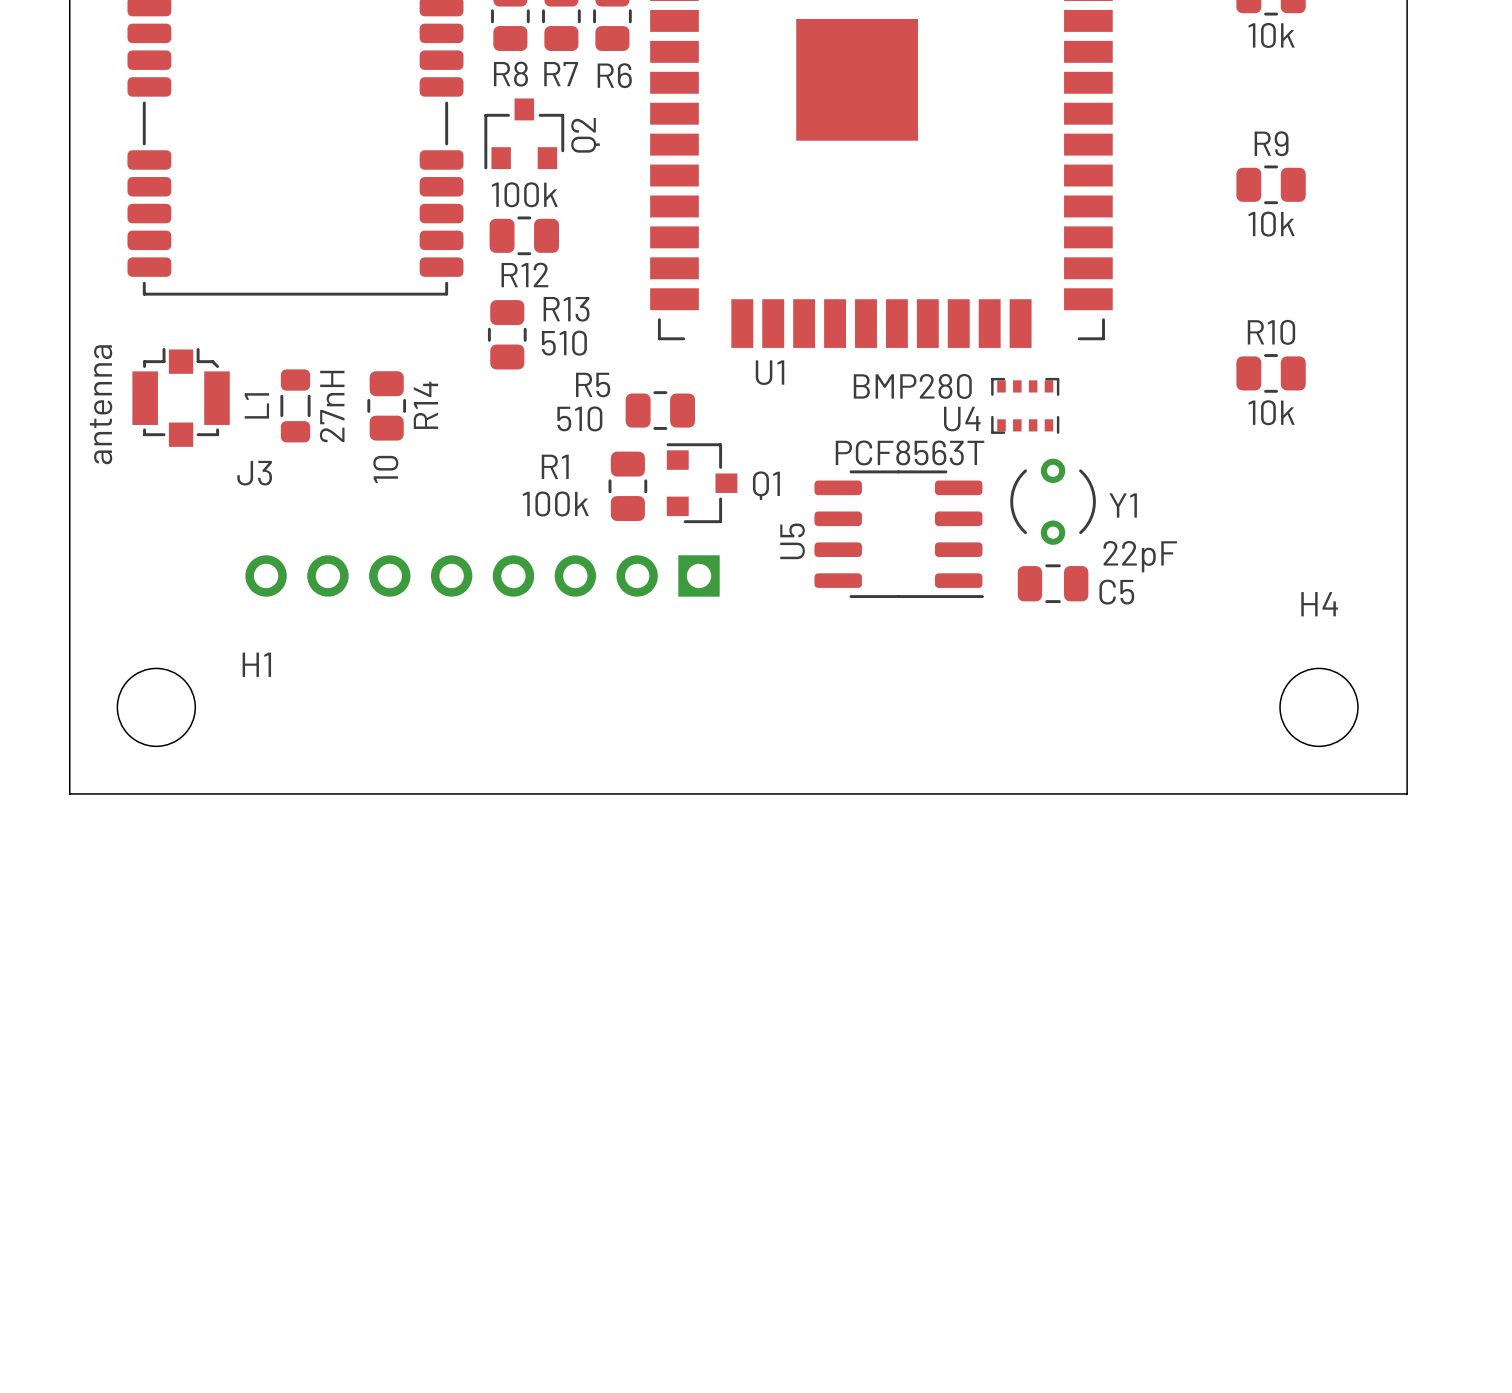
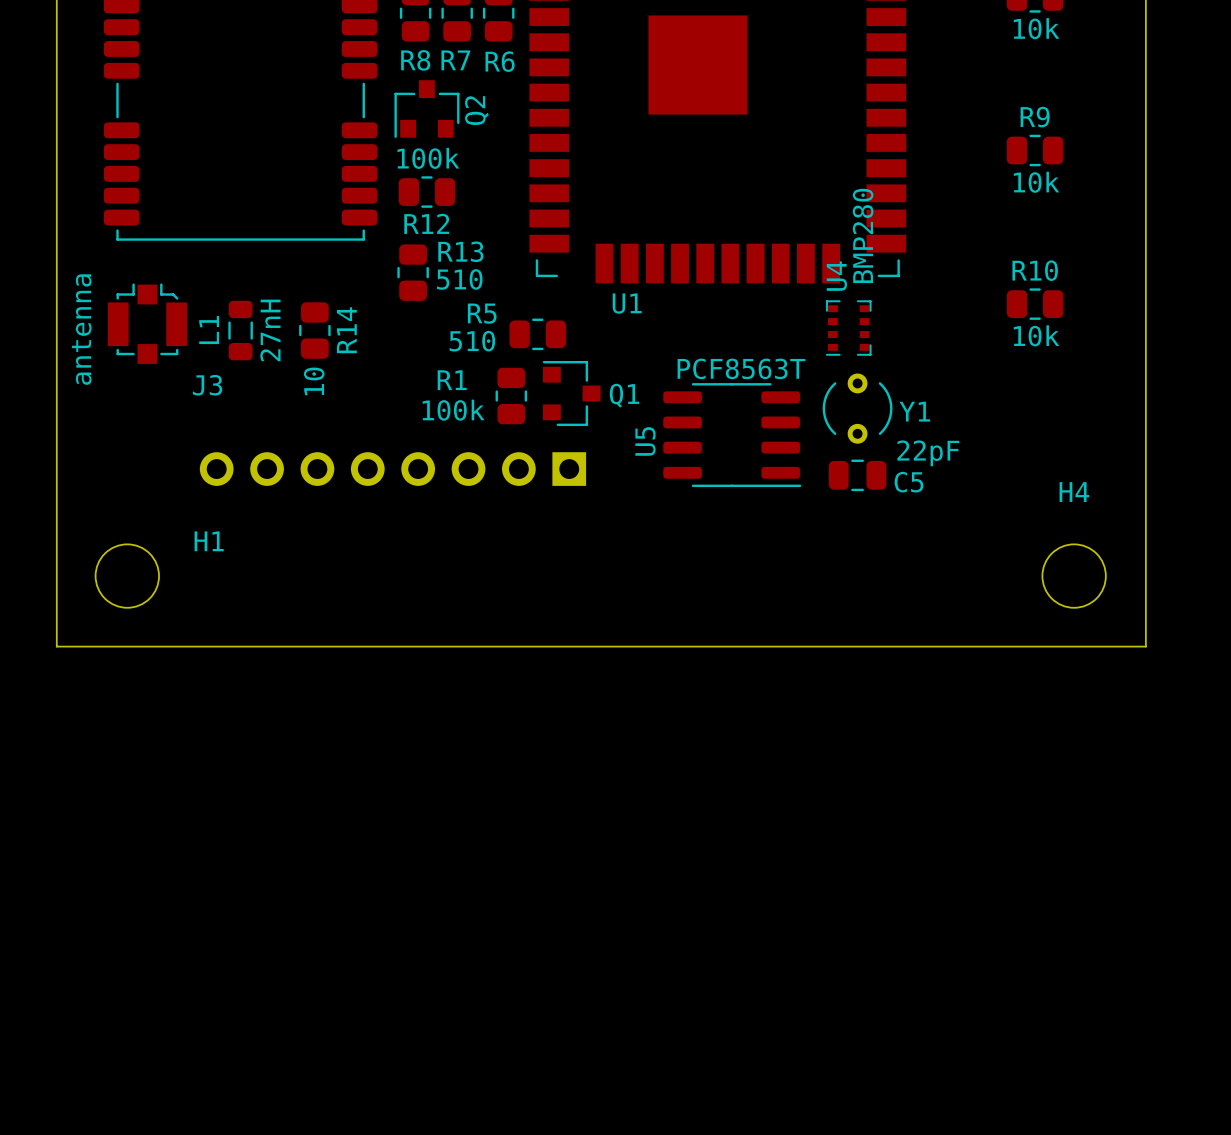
U4 rotation: 0° (1025, 405) -> 90° clockwise (848, 328)

